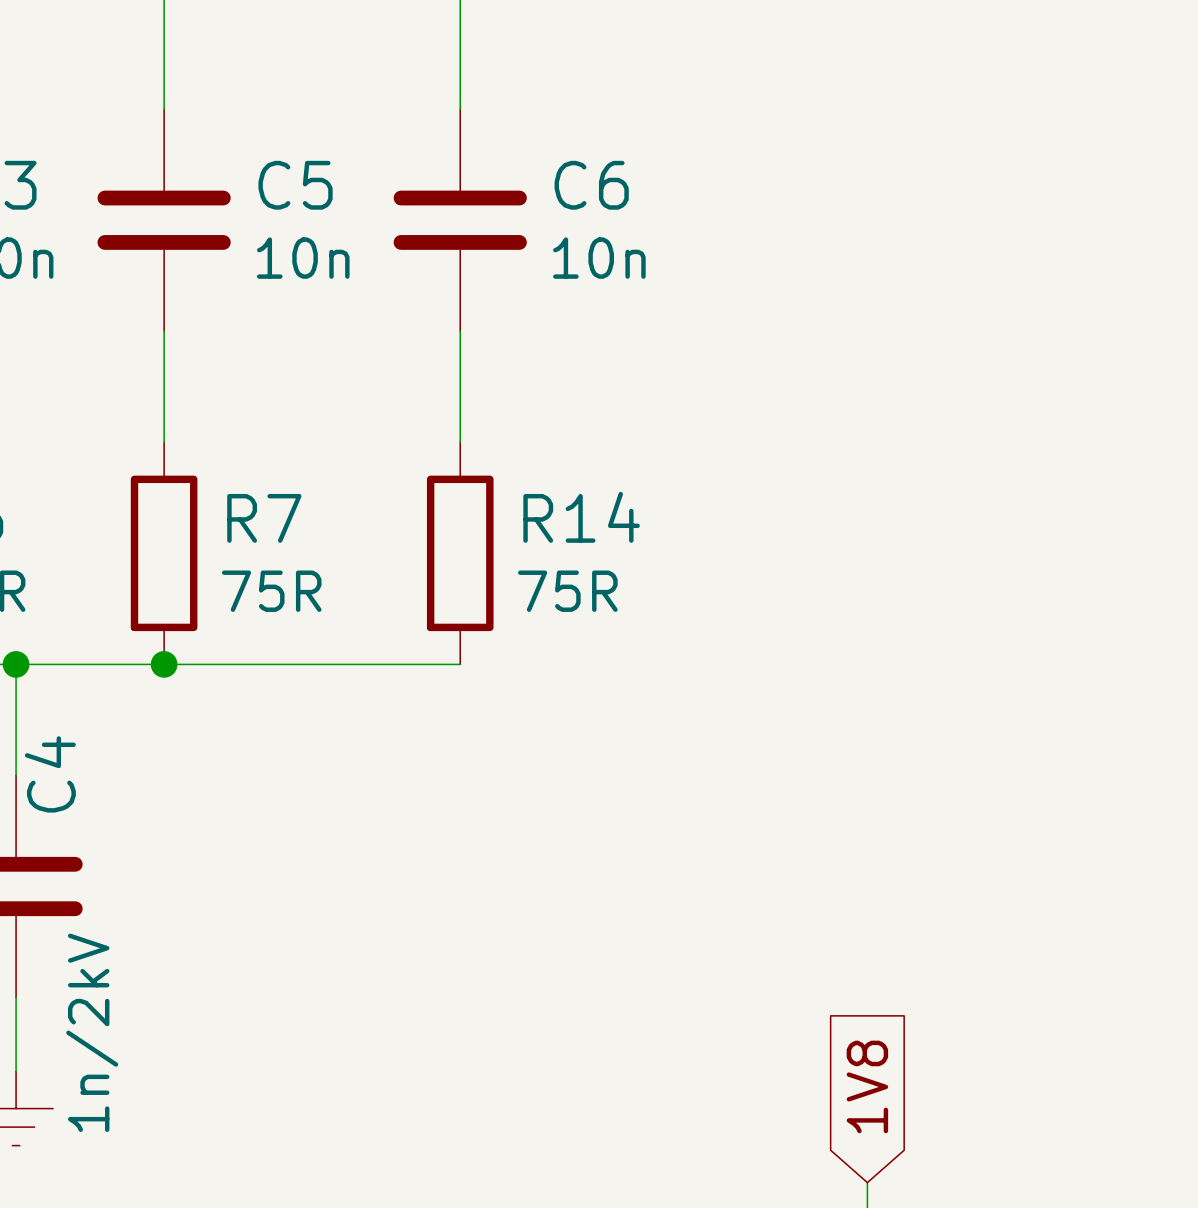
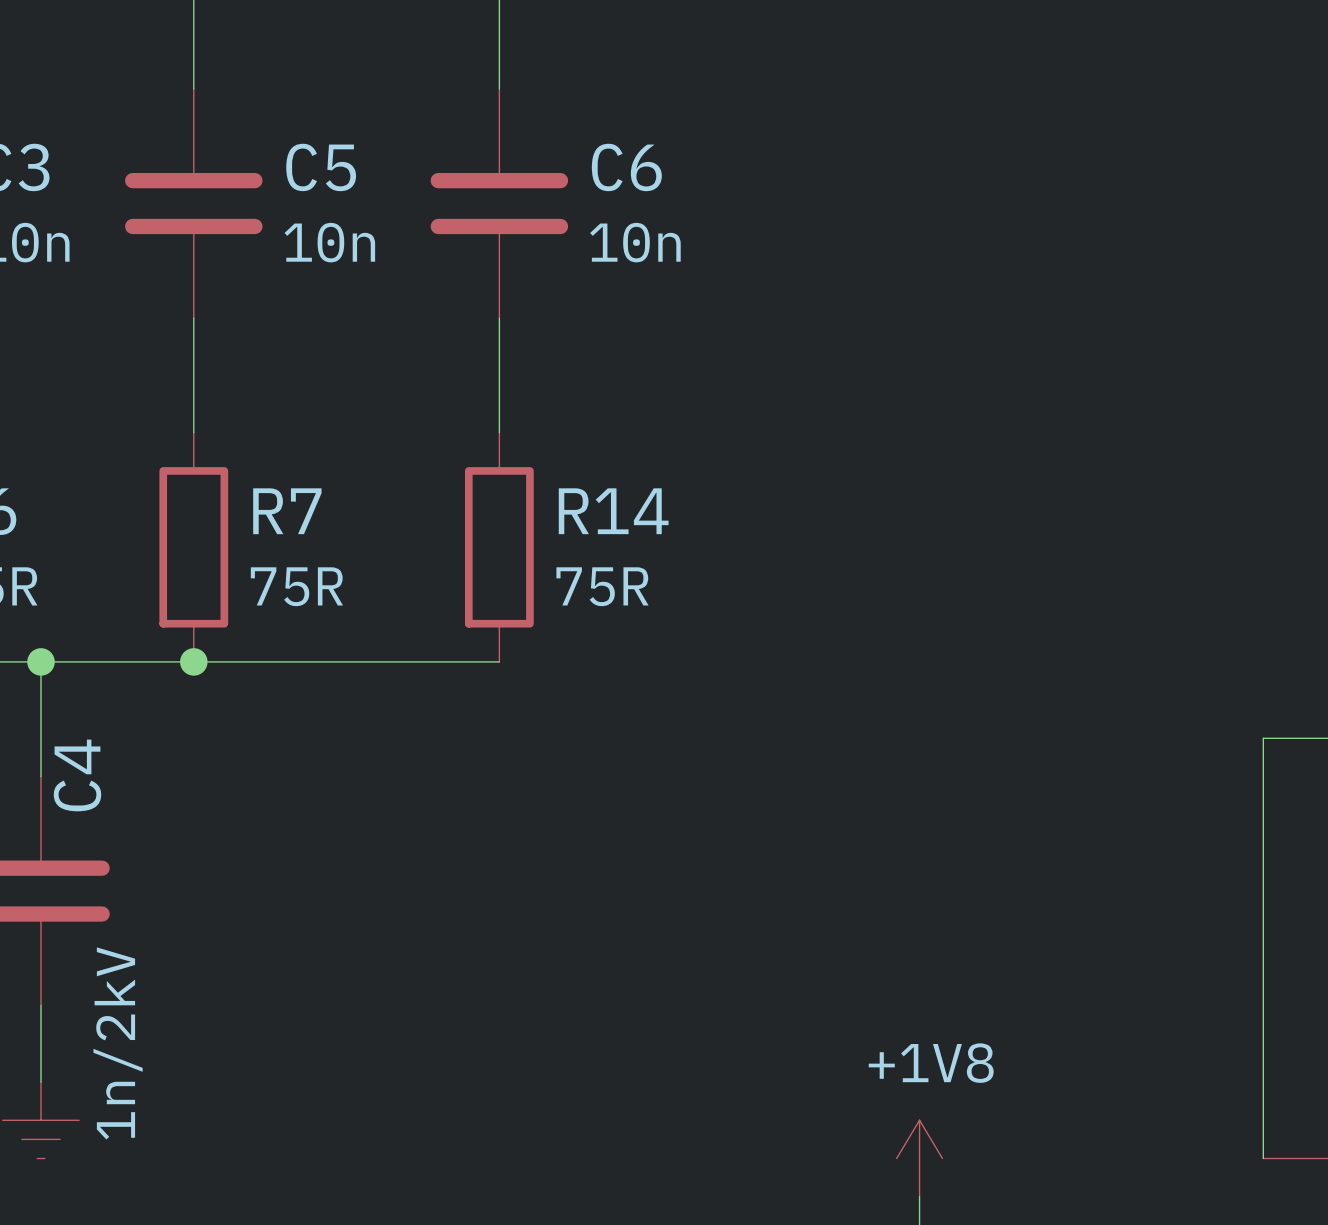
global label: 1V8 (867, 1086) -> none
power symbol: none -> +1V8 (919, 1158)

